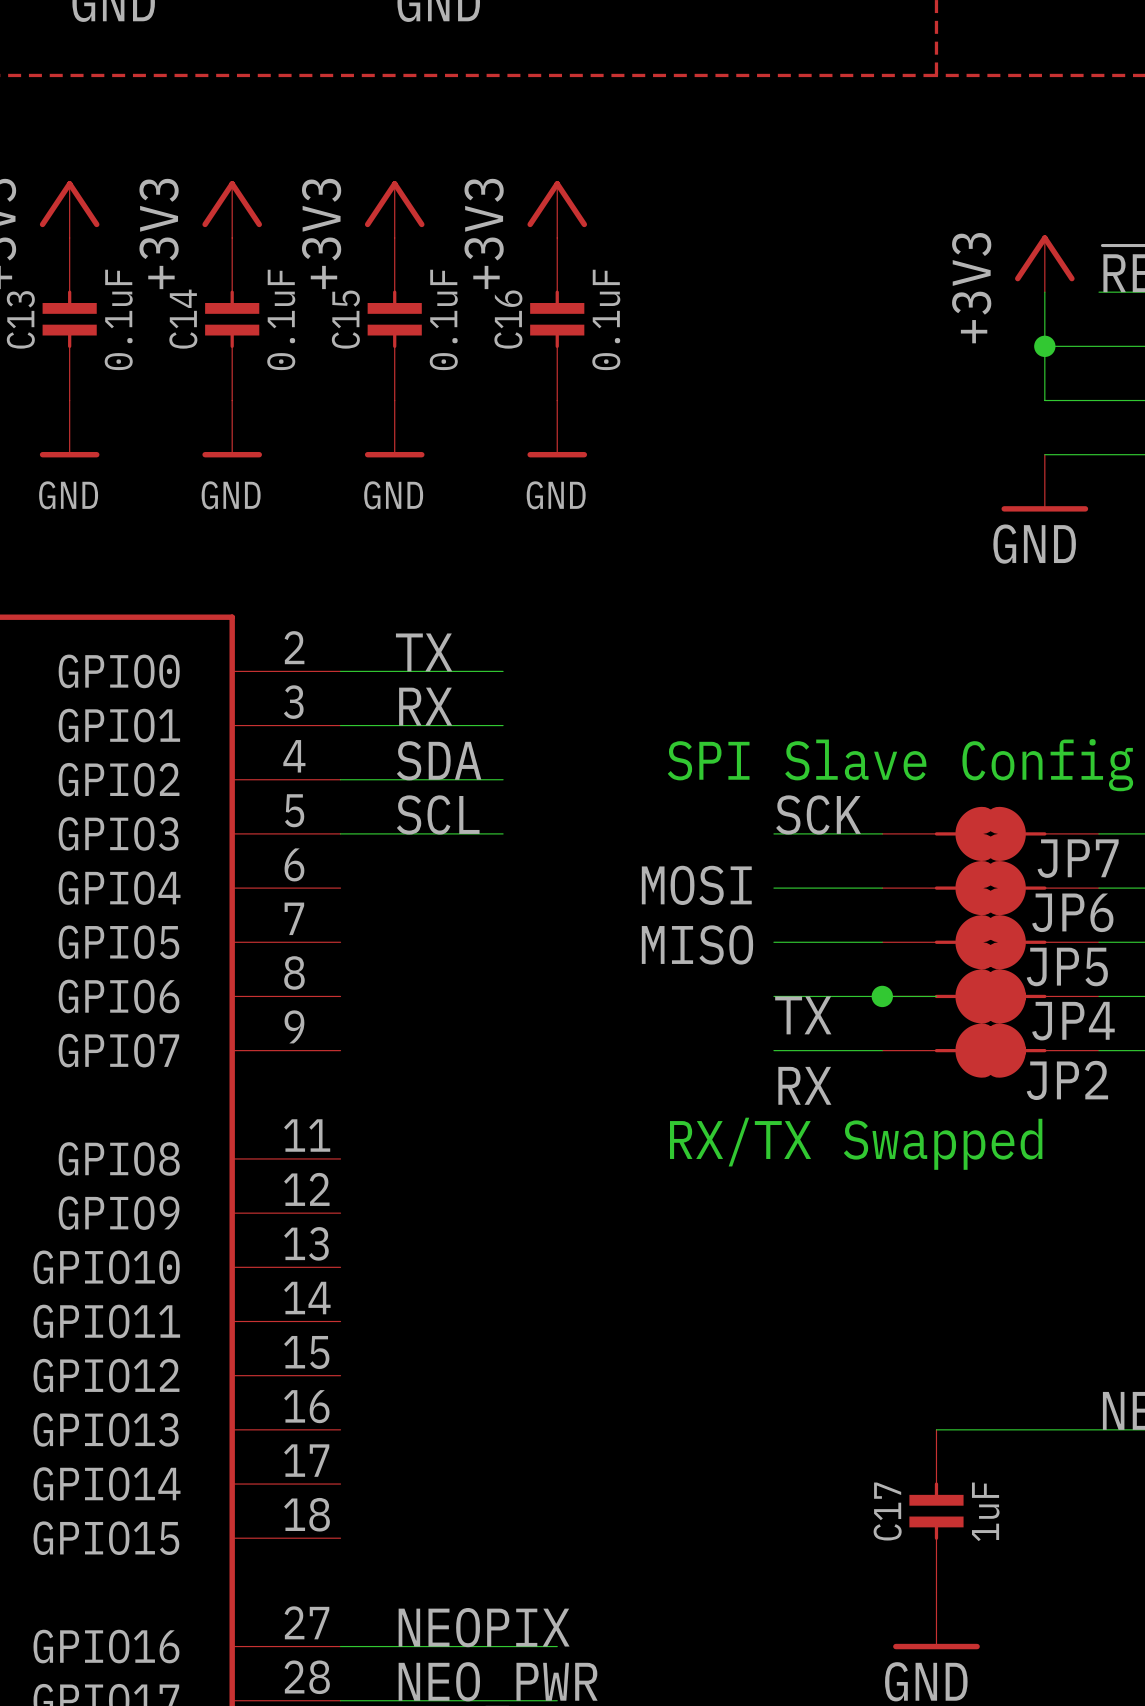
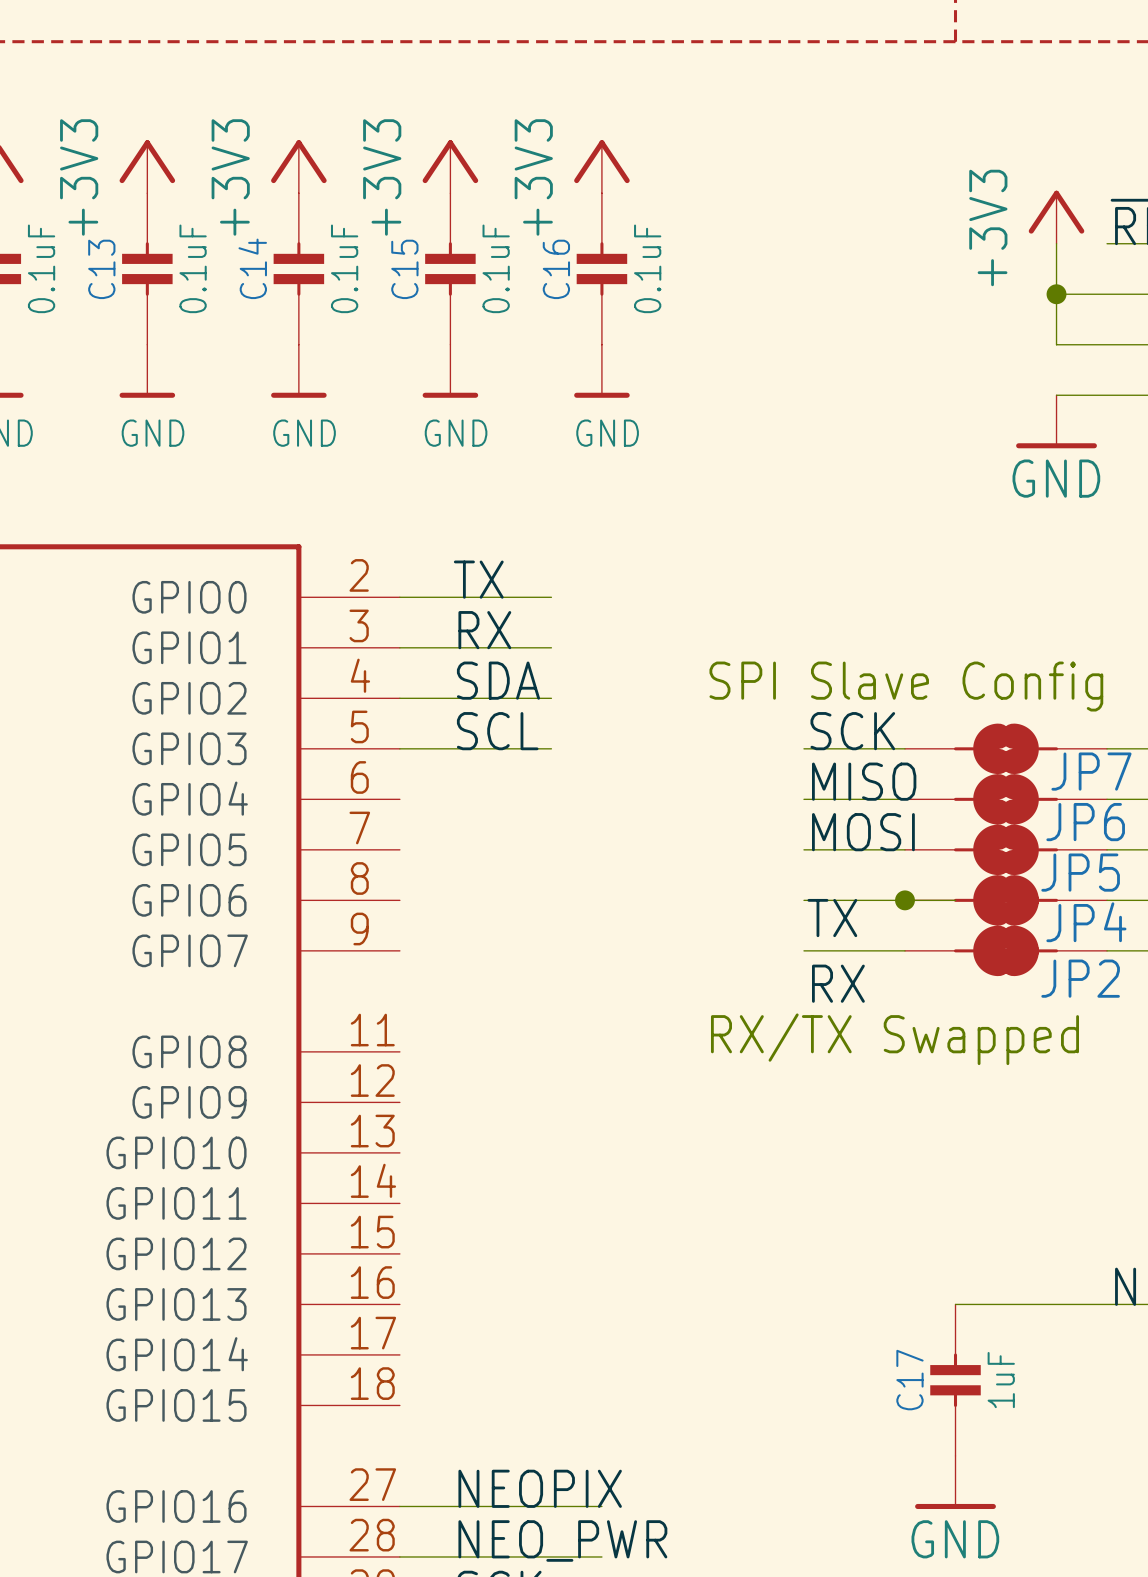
label position: MOSI (696, 885) -> MOSI (863, 832)
label position: MISO (697, 944) -> MISO (864, 781)

